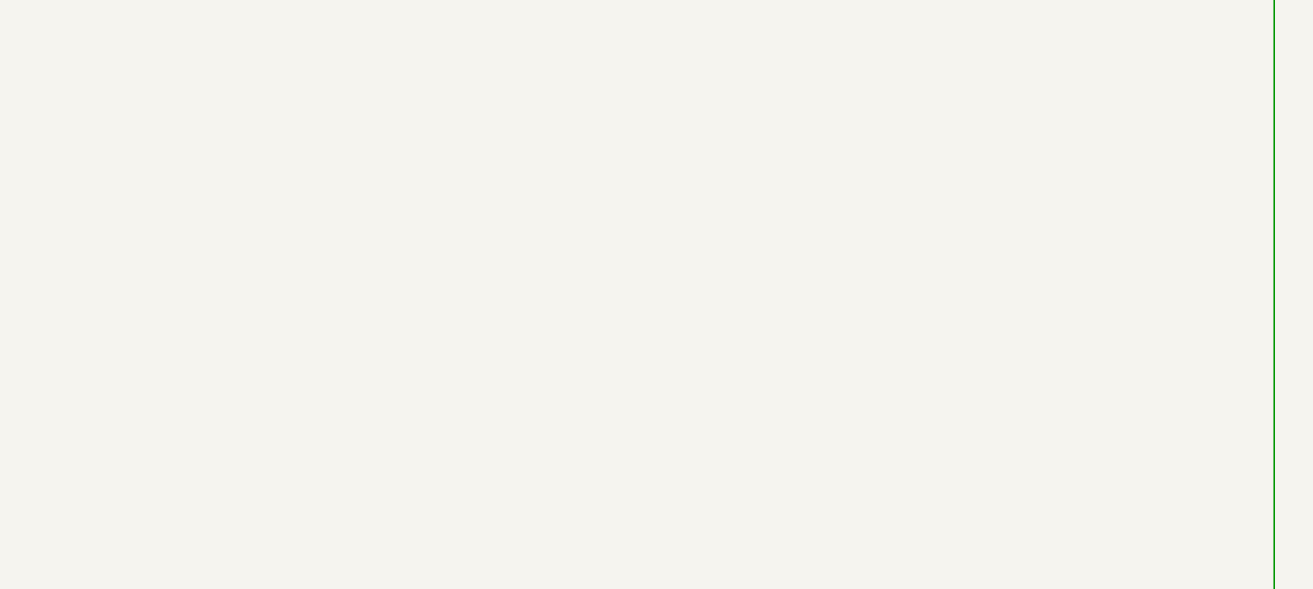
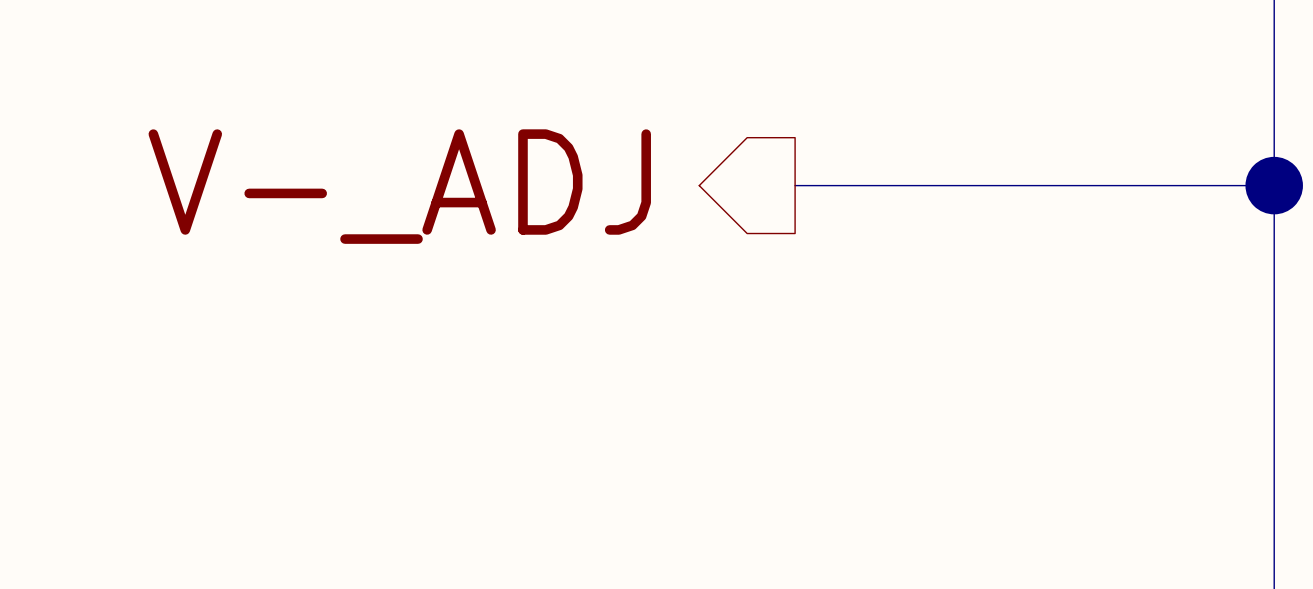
wire: none -> (795, 185) (1274, 185)
junction: none -> (1274, 185)
hierarchical label: none -> V-_ADJ (399, 186)

